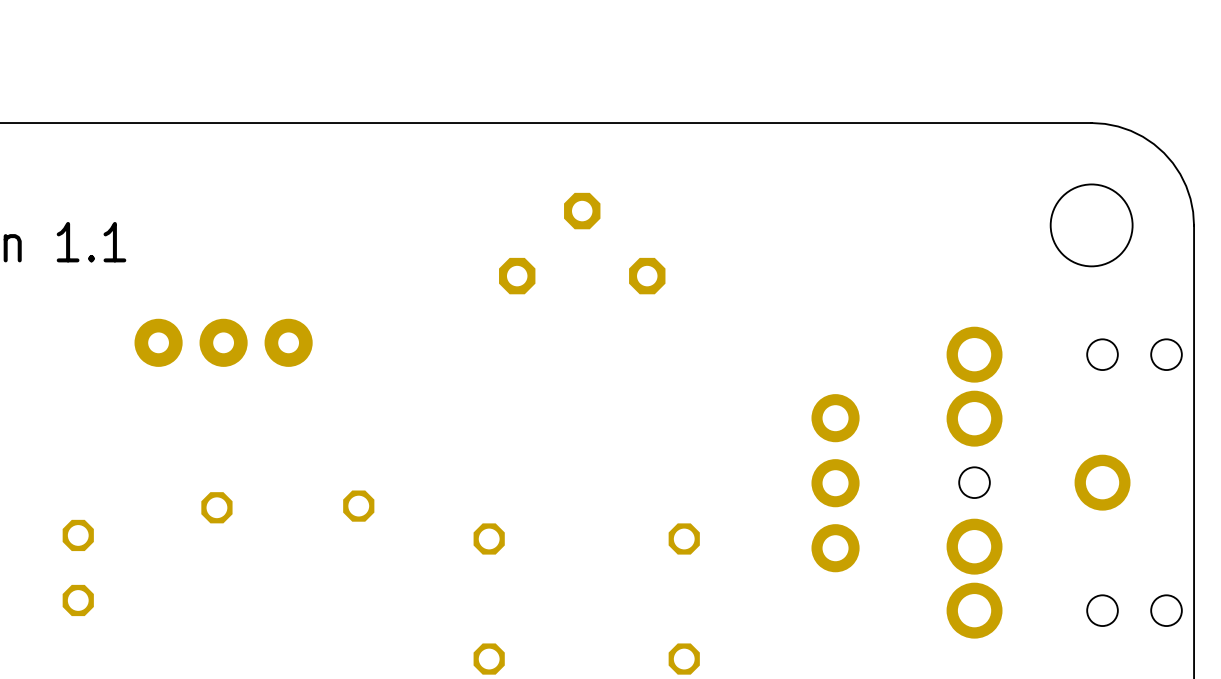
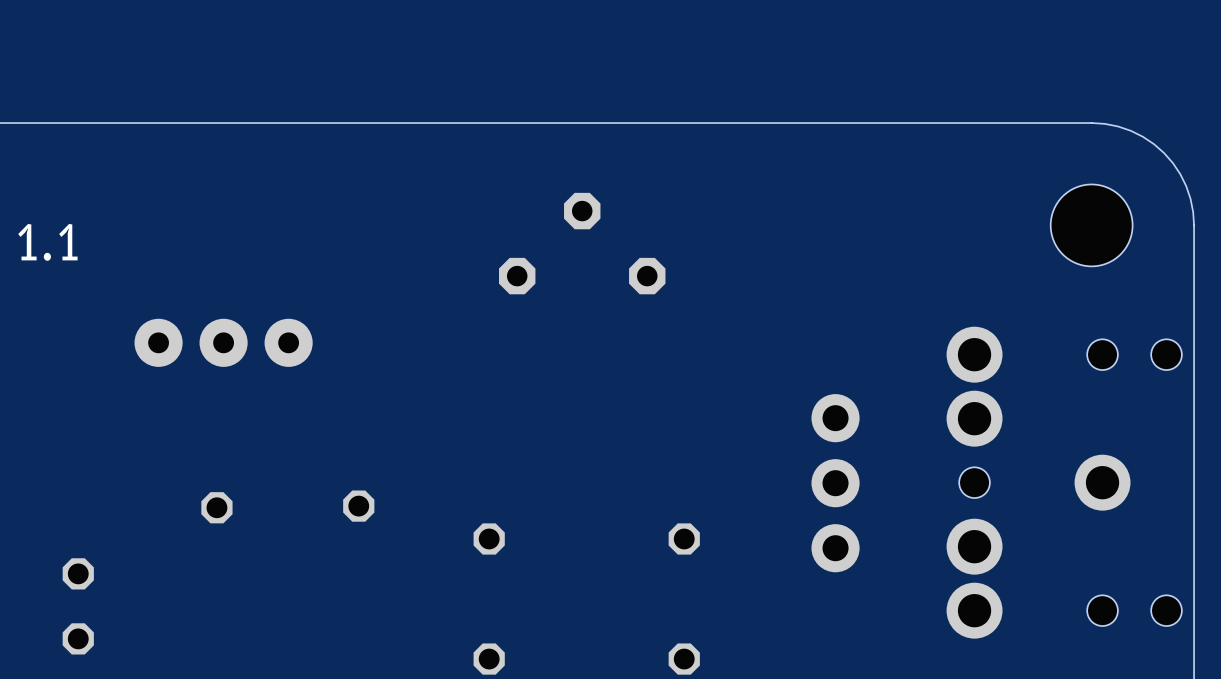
part position: (78, 567) -> (78, 606)

